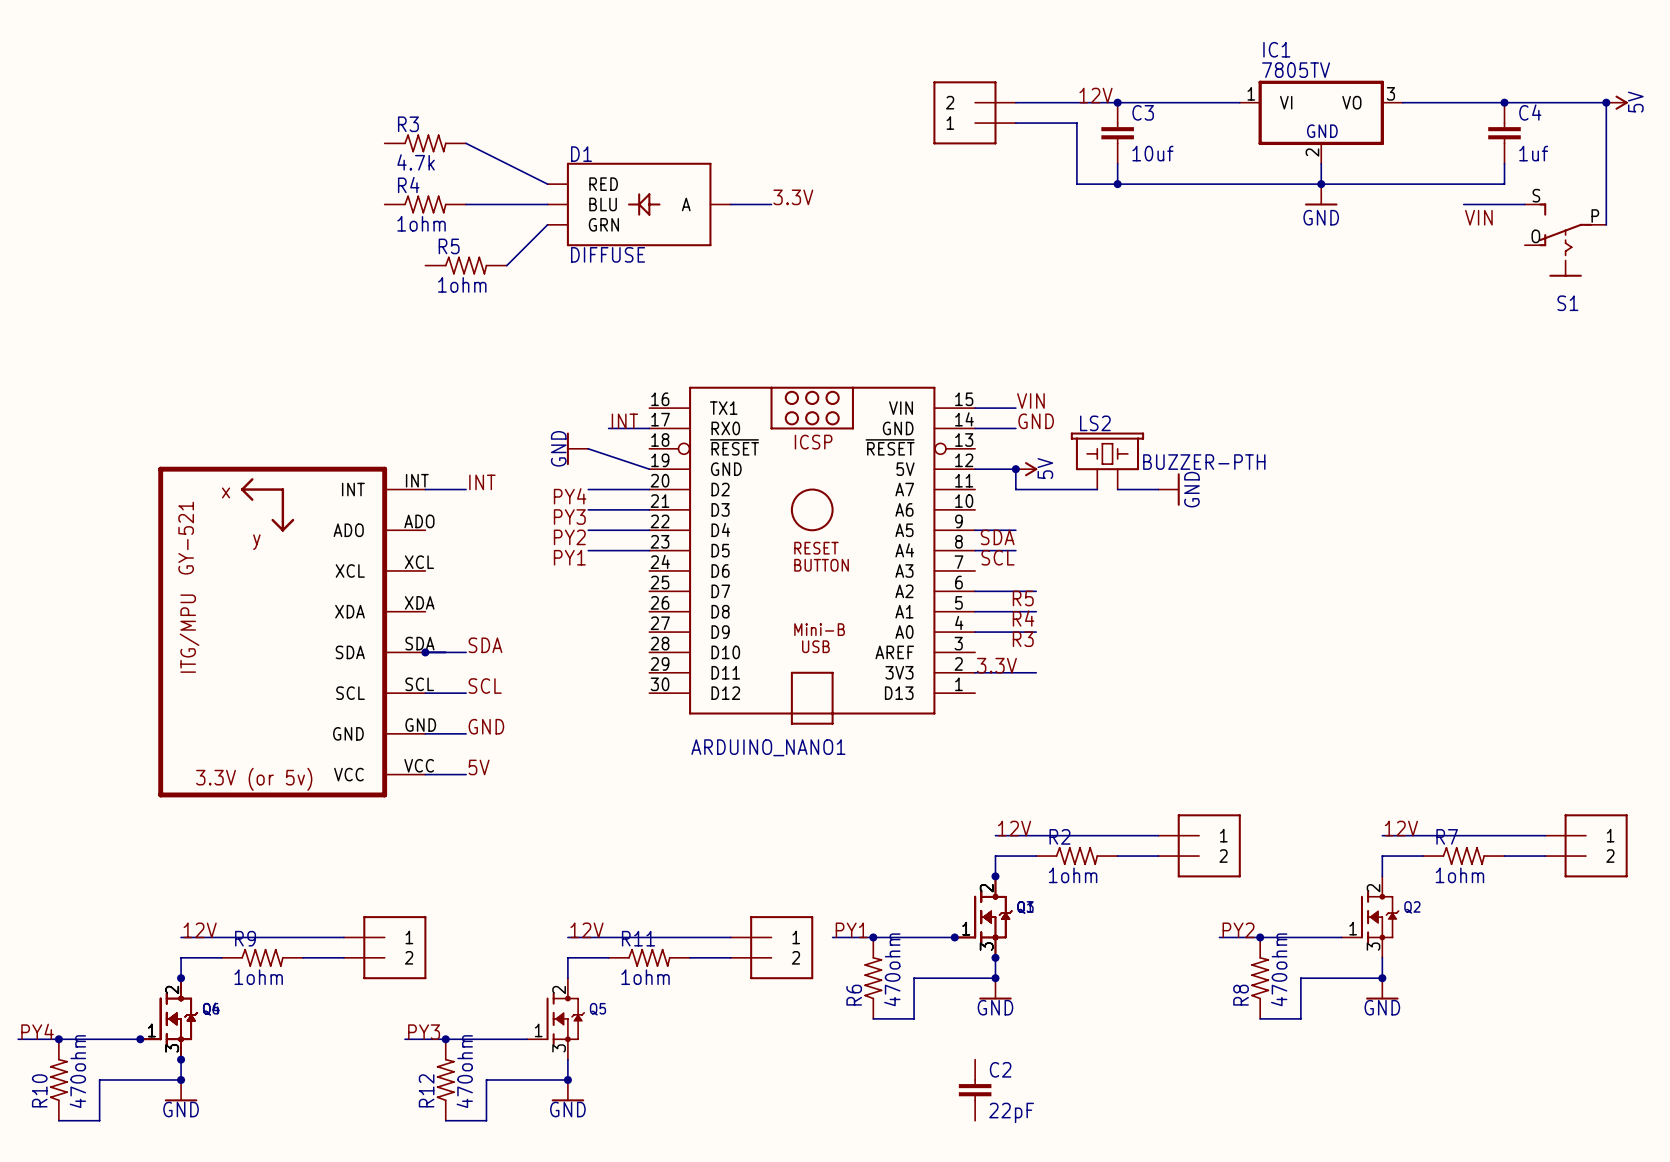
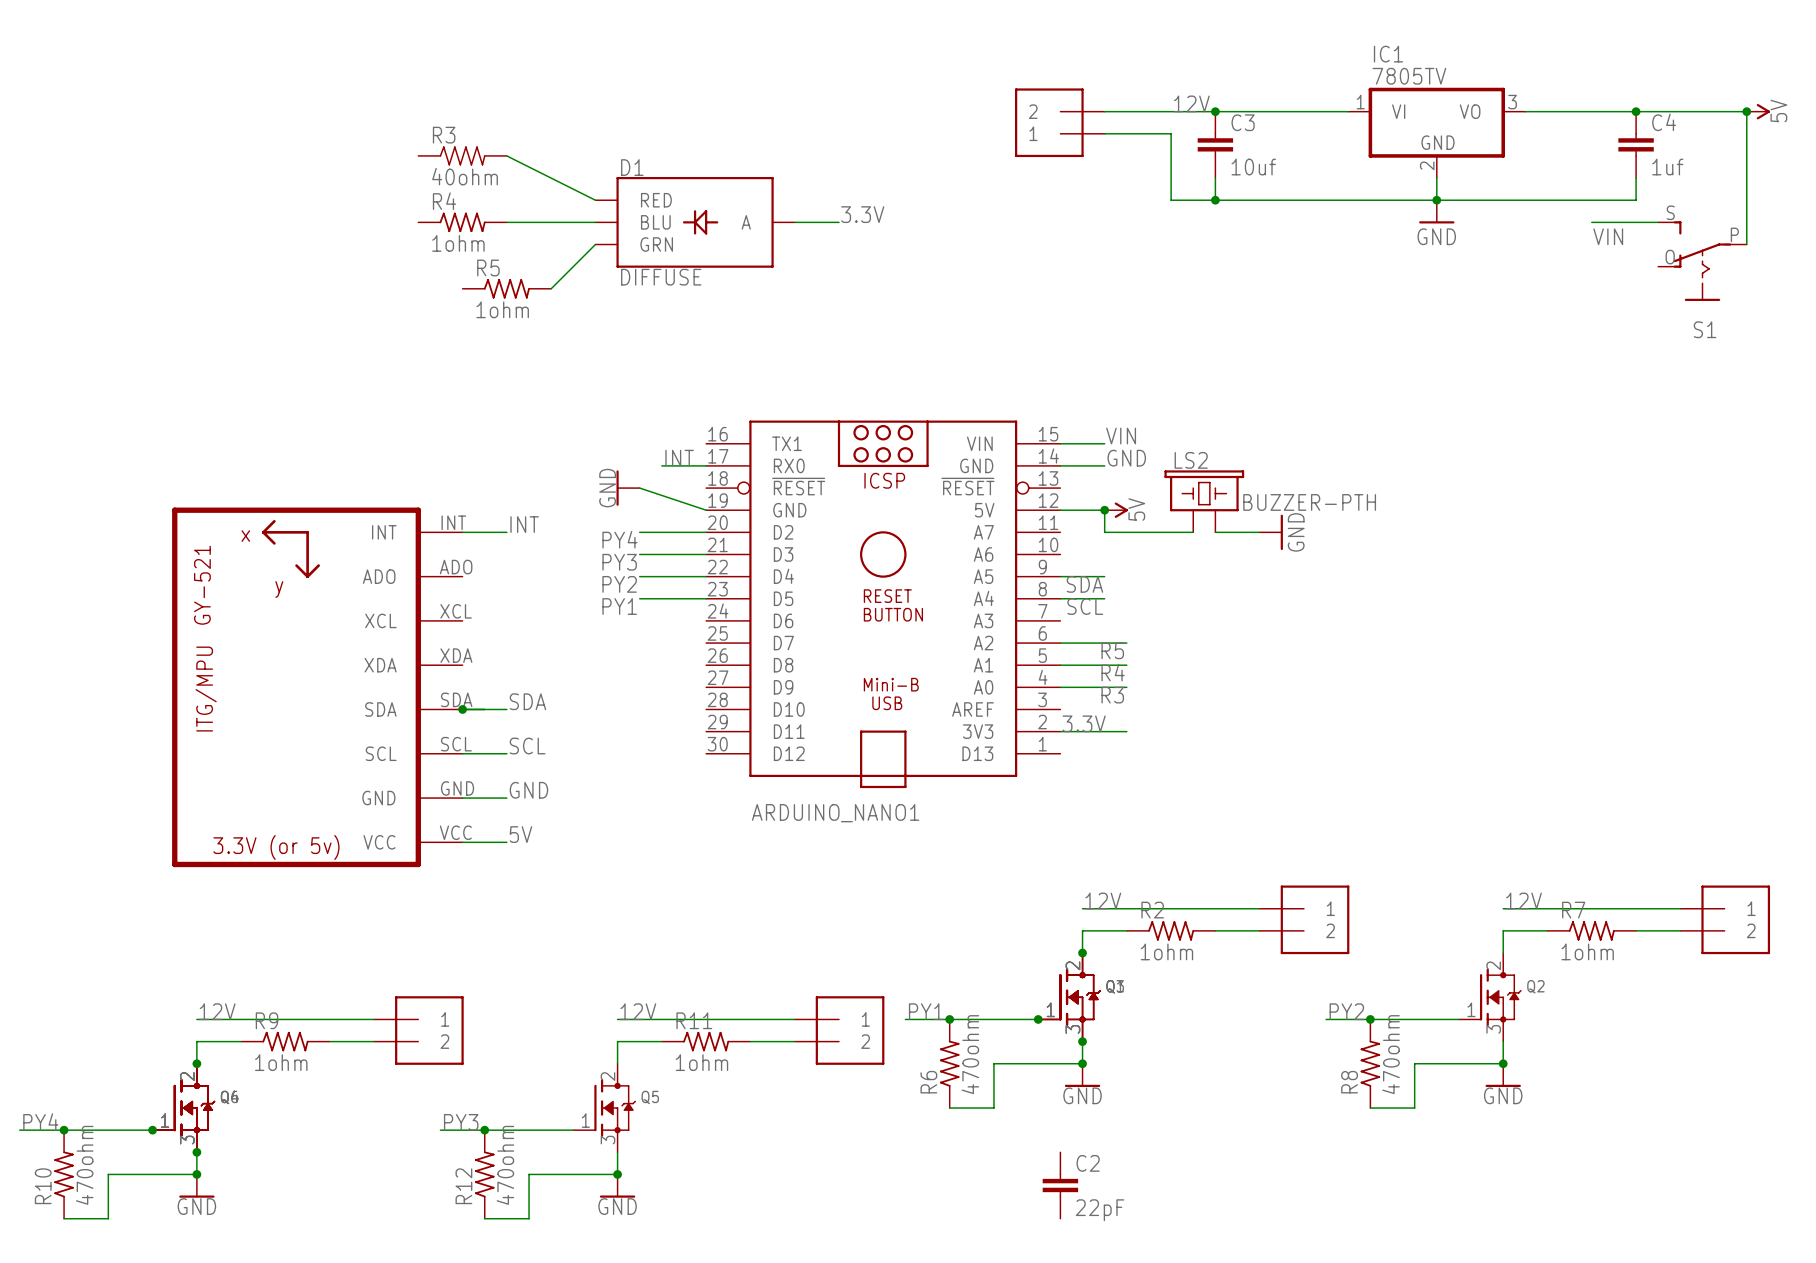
R3 value: 4.7k (416, 162) -> 40ohm (465, 176)

